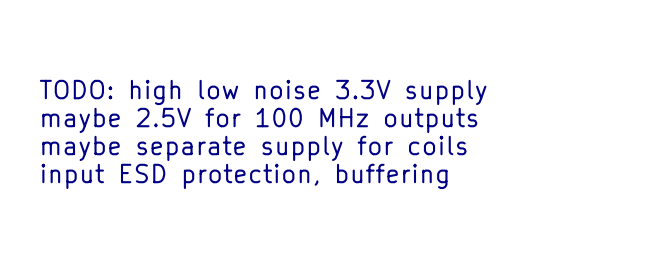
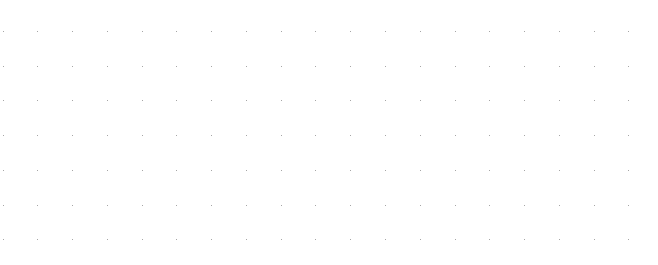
text: TODO: high low noise 3.3V supply (263, 92) -> none
text: maybe 2.5V for 100 MHz outputs (259, 120) -> none
text: maybe separate supply for coils (254, 148) -> none
text: input ESD protection, buffering (244, 176) -> none

